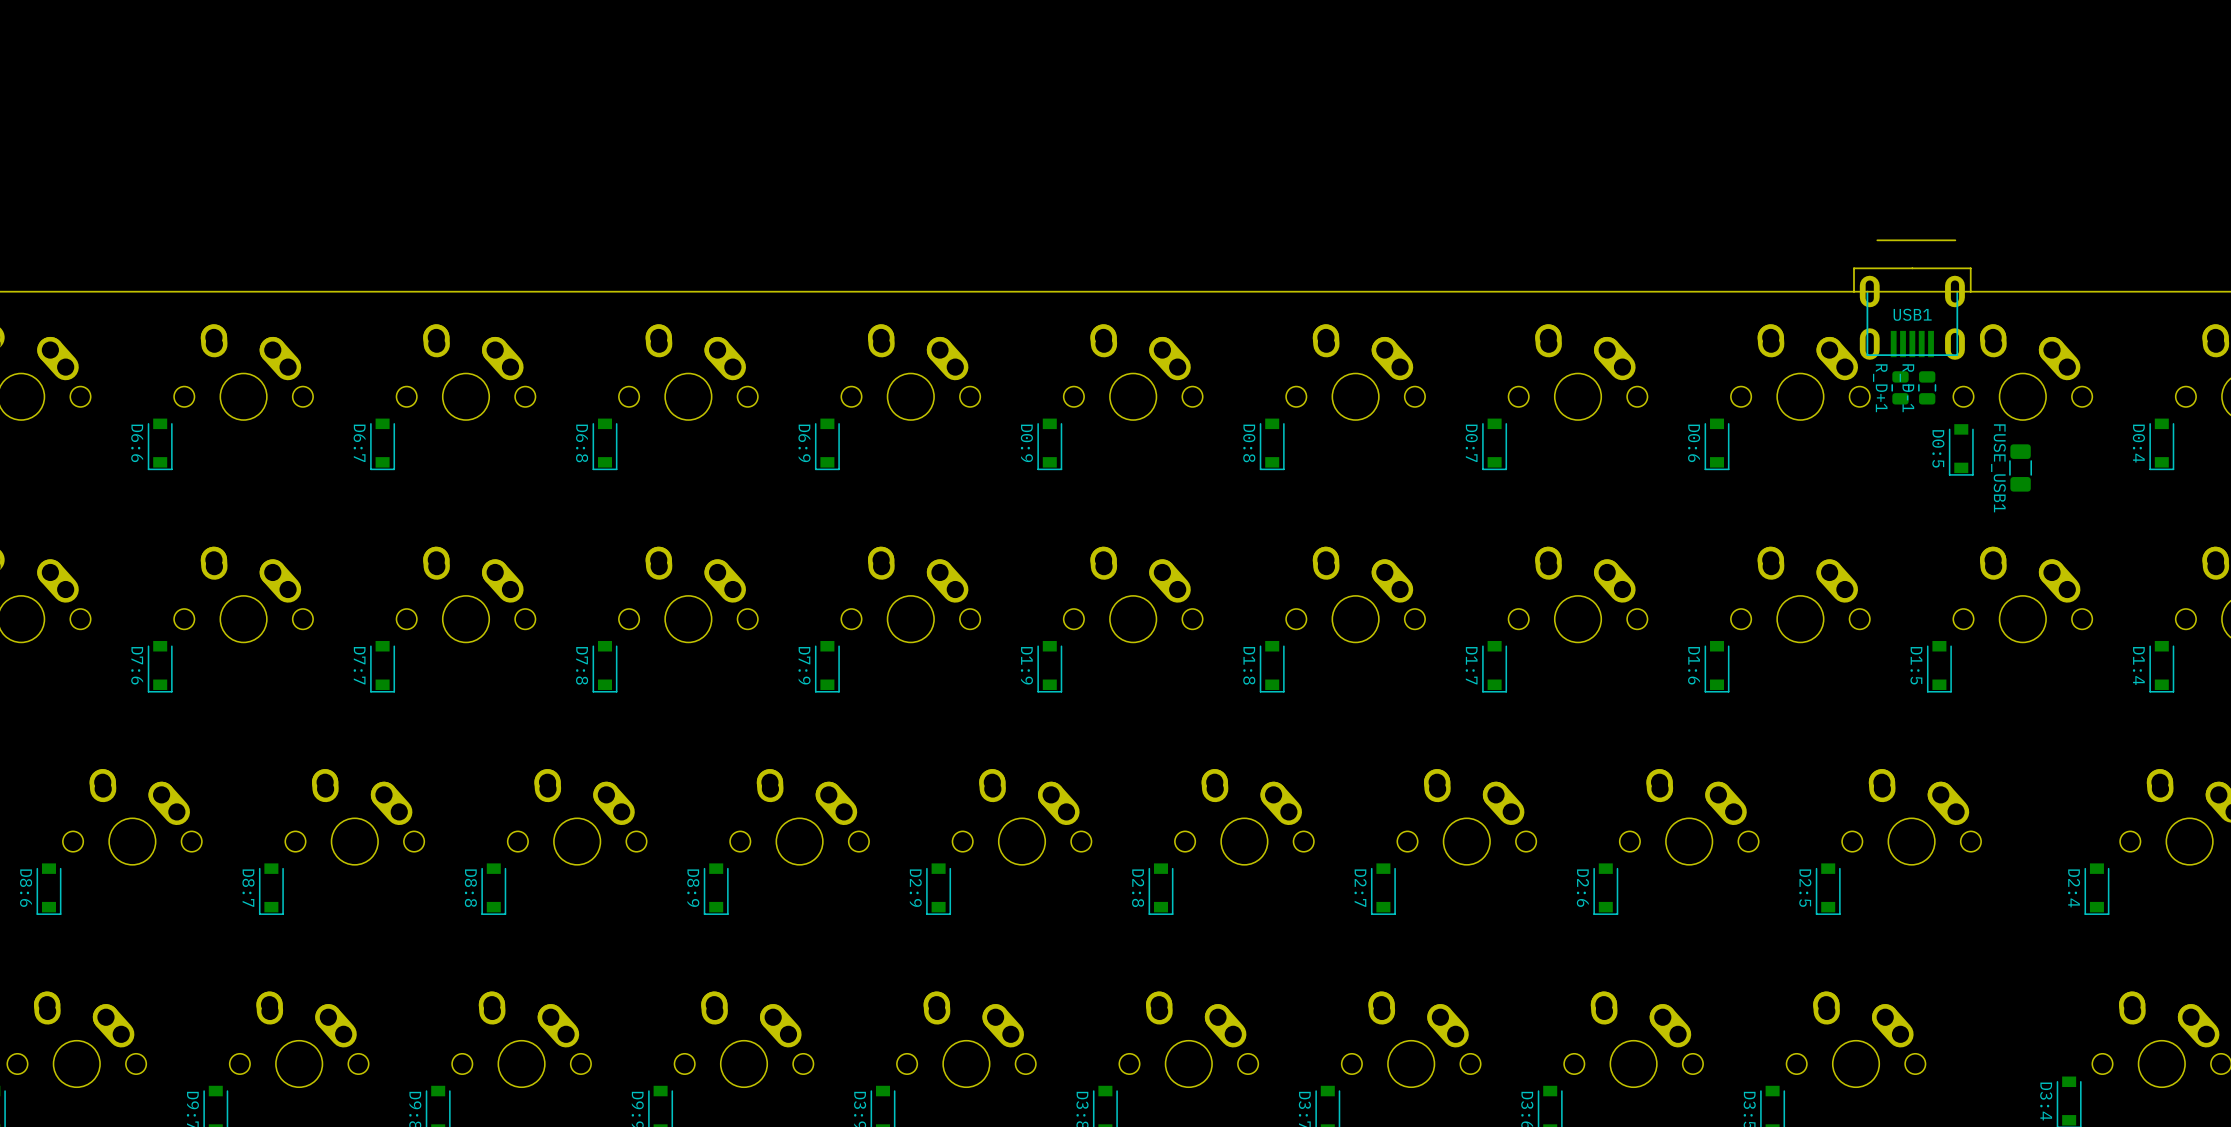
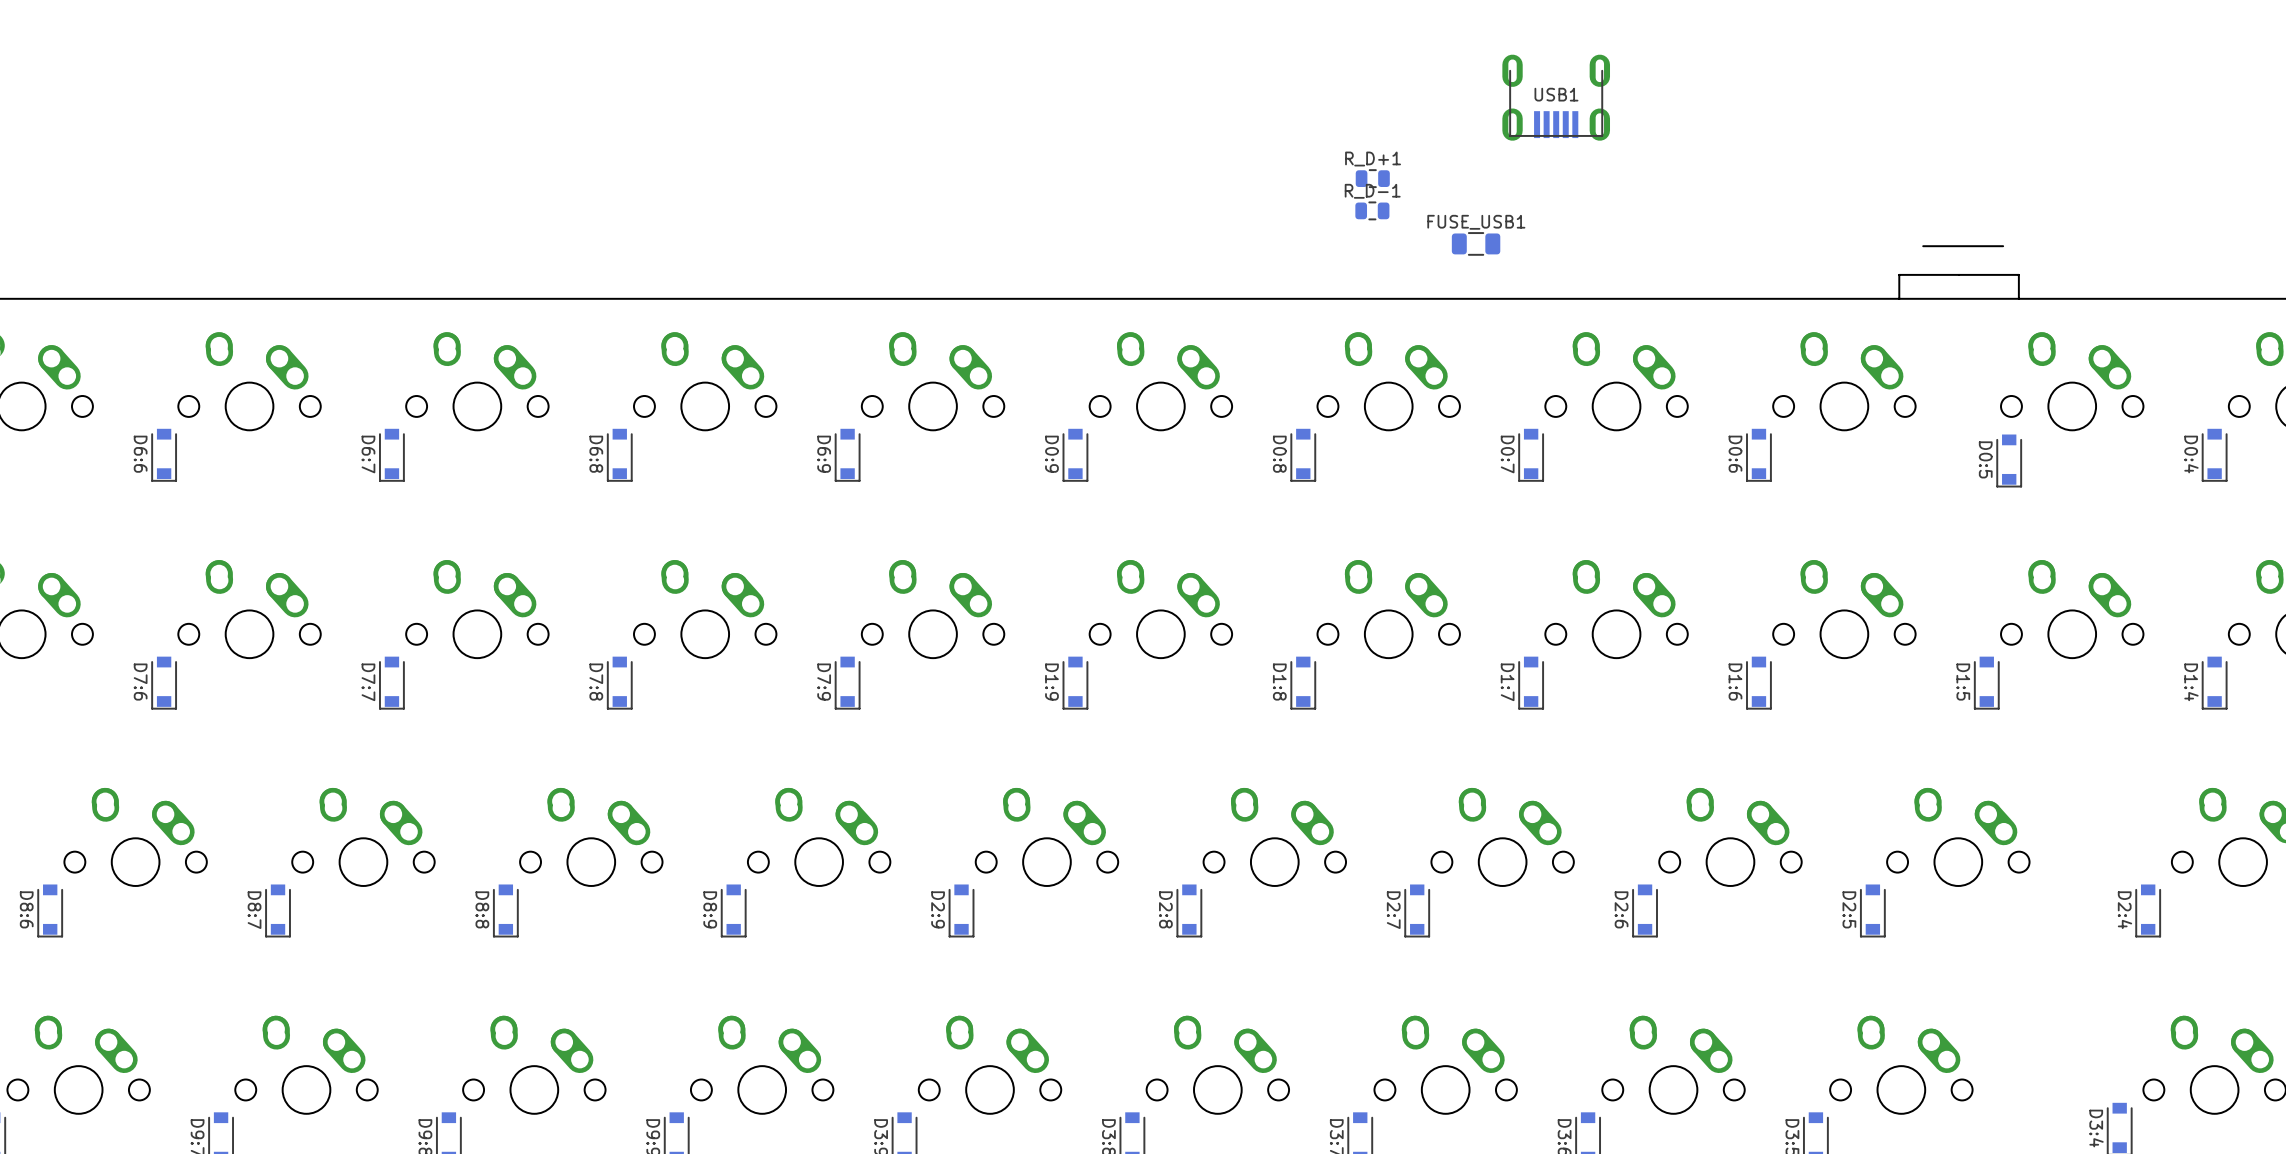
USB1 position: (1912, 317) -> (1556, 97)
R_D+1 rotation: 0° (1900, 387) -> 90° clockwise (1372, 178)
R_D+1 position: (1900, 387) -> (1372, 178)
R_D-1 rotation: 0° (1927, 387) -> 90° clockwise (1372, 210)
R_D-1 position: (1927, 387) -> (1372, 210)
FUSE_USB1 rotation: 0° (2020, 467) -> 90° clockwise (1476, 243)
FUSE_USB1 position: (2020, 467) -> (1476, 243)

